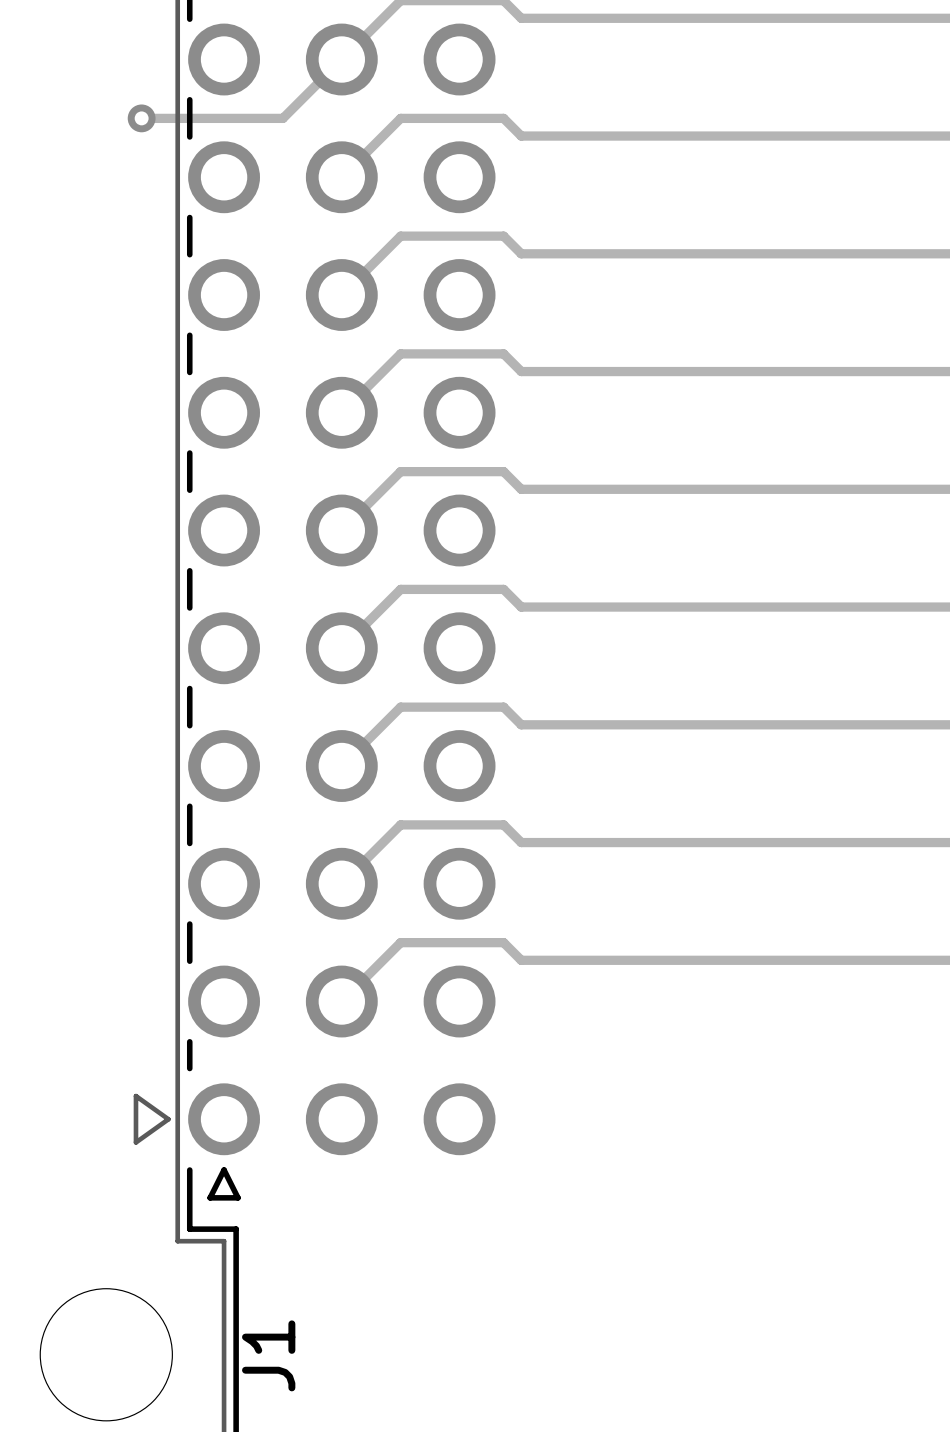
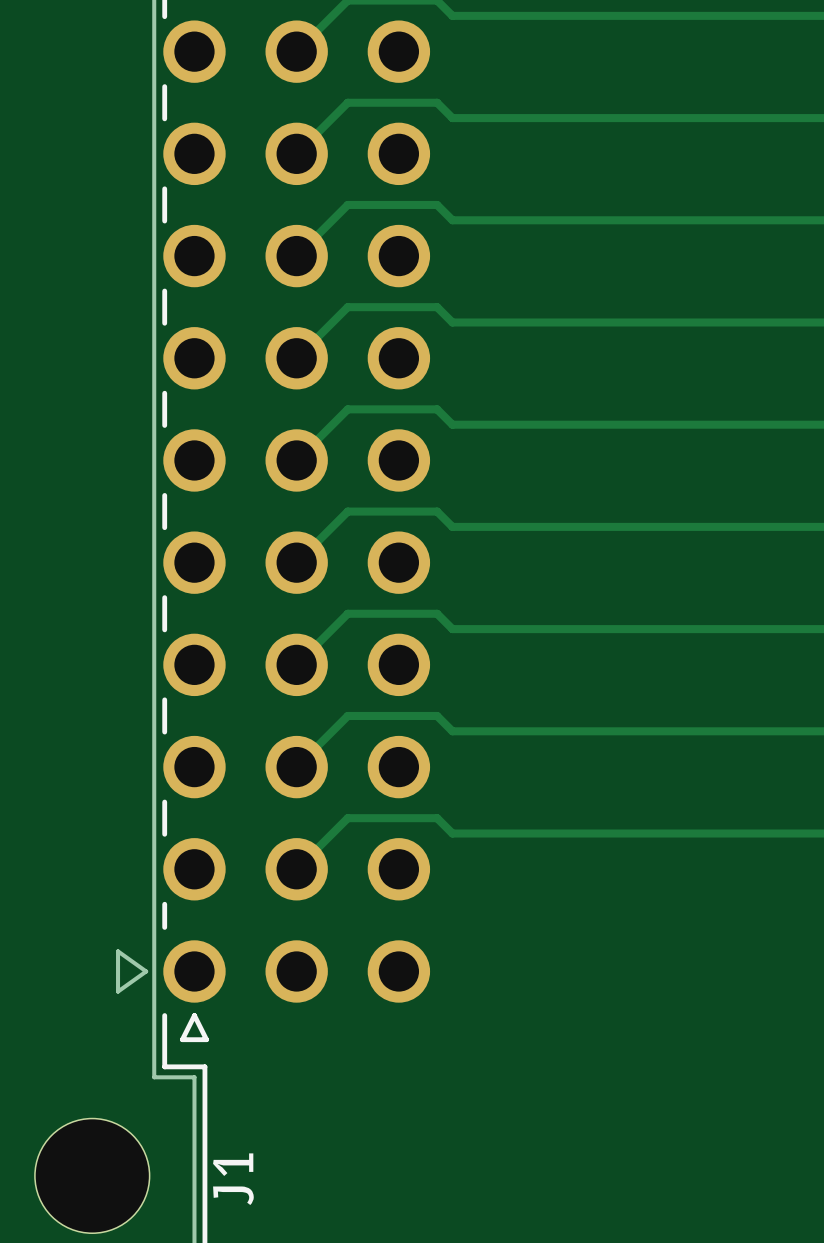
track: (341, 59) (282, 118) (141, 118) -> none
via: (141, 118) -> none

